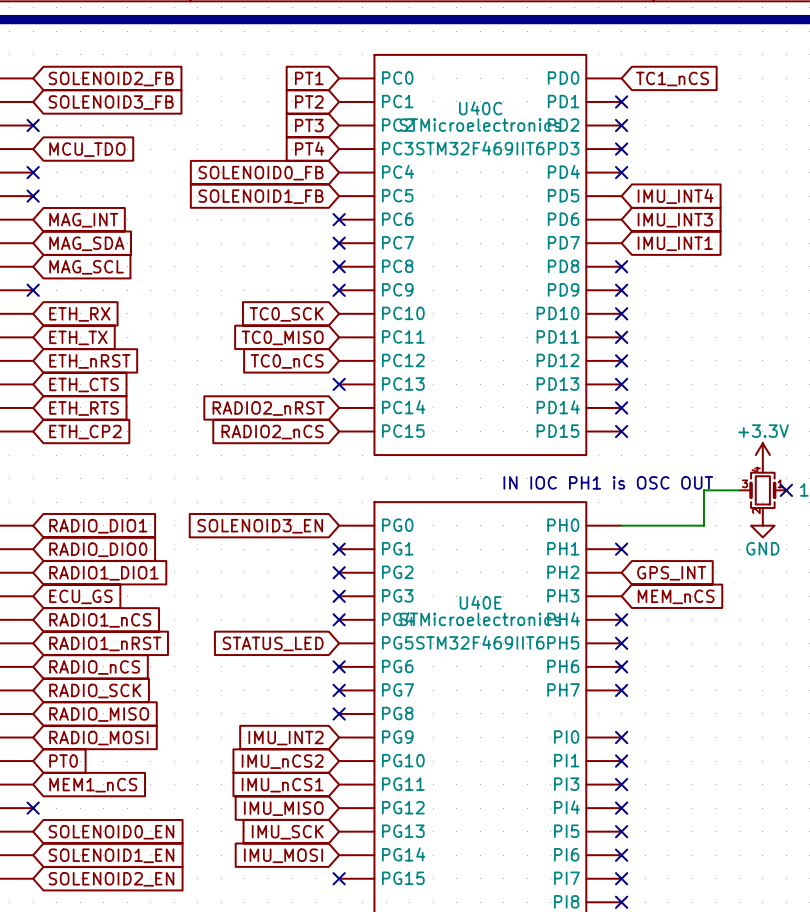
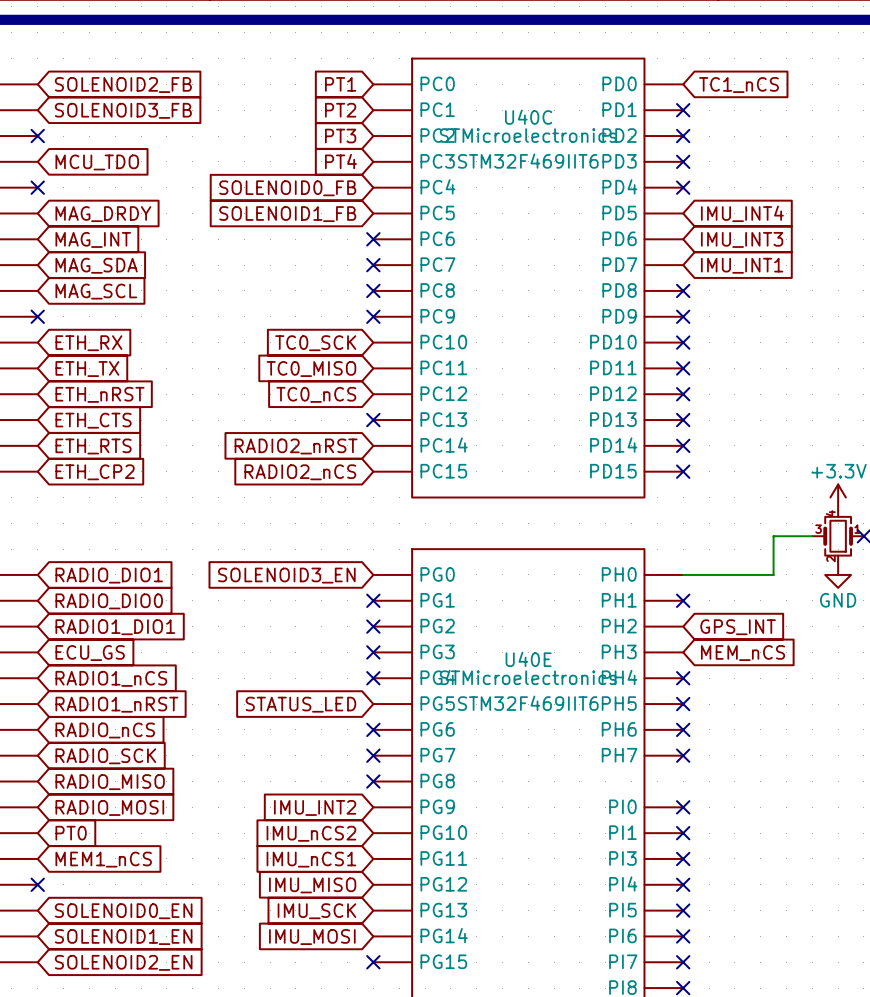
no-connect mark: (33, 196) -> none
global label: none -> MAG_DRDY (103, 214)
text: IN IOC PH1 is OSC OUT (608, 482) -> none

